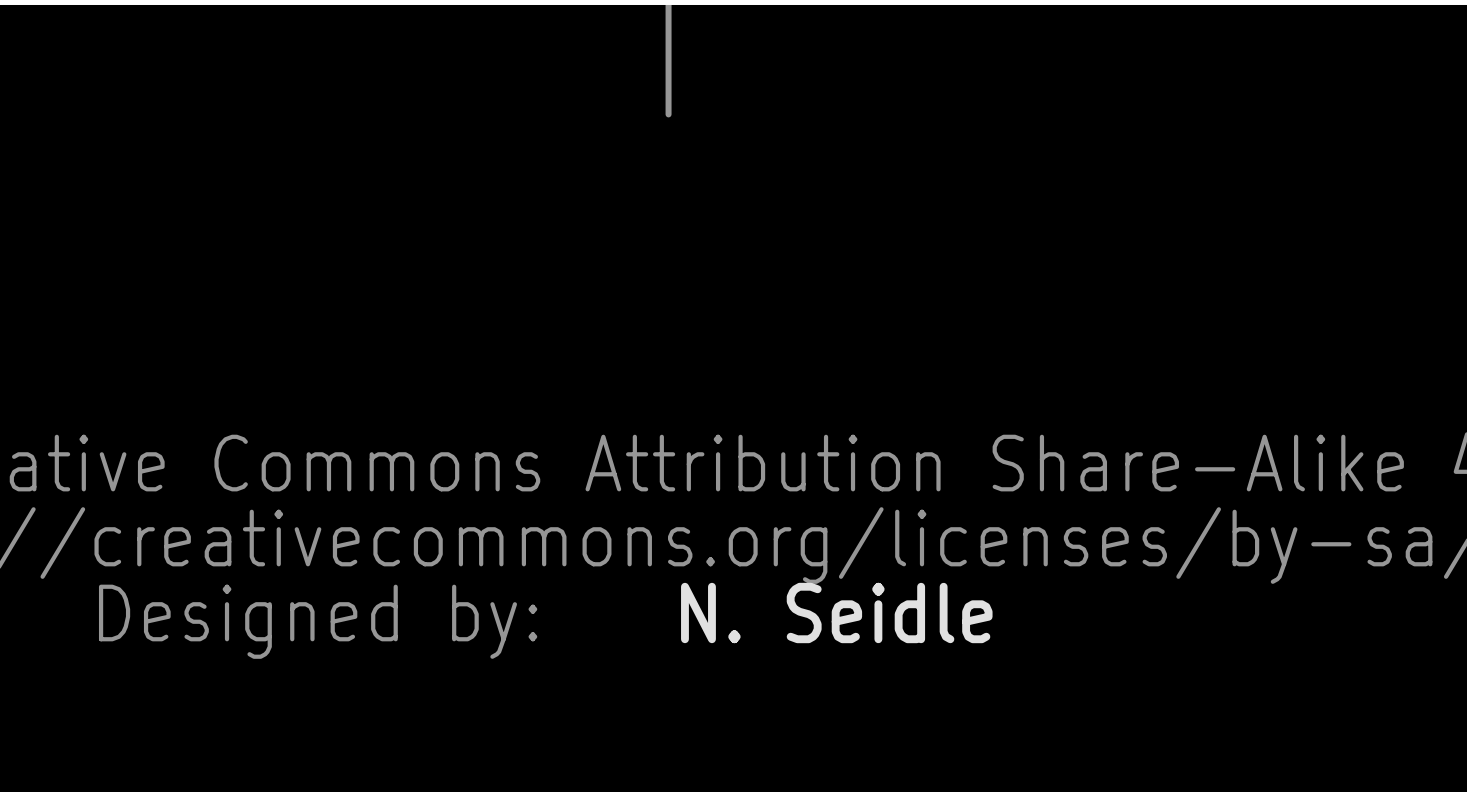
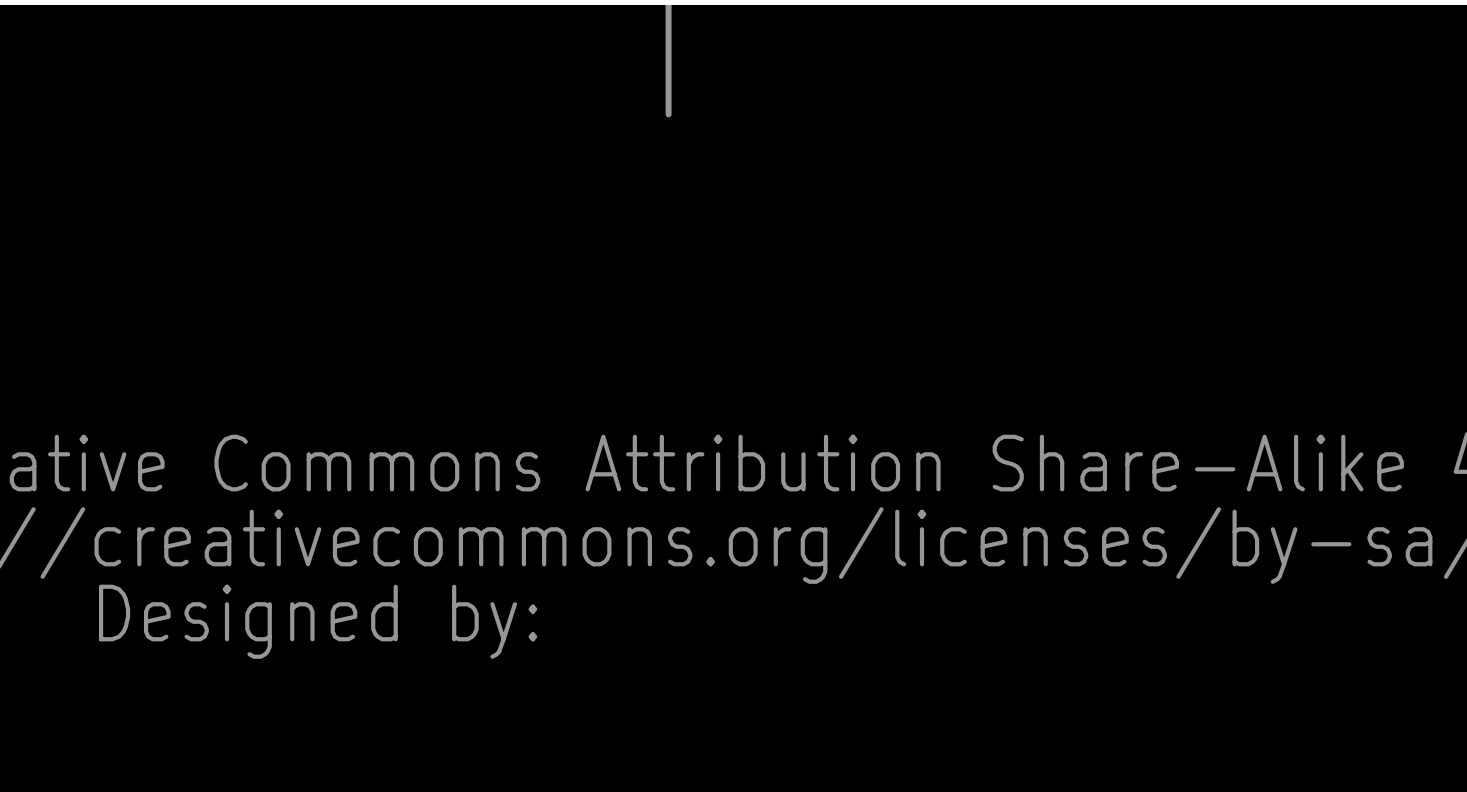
text: N. Seidle (836, 613) -> none

